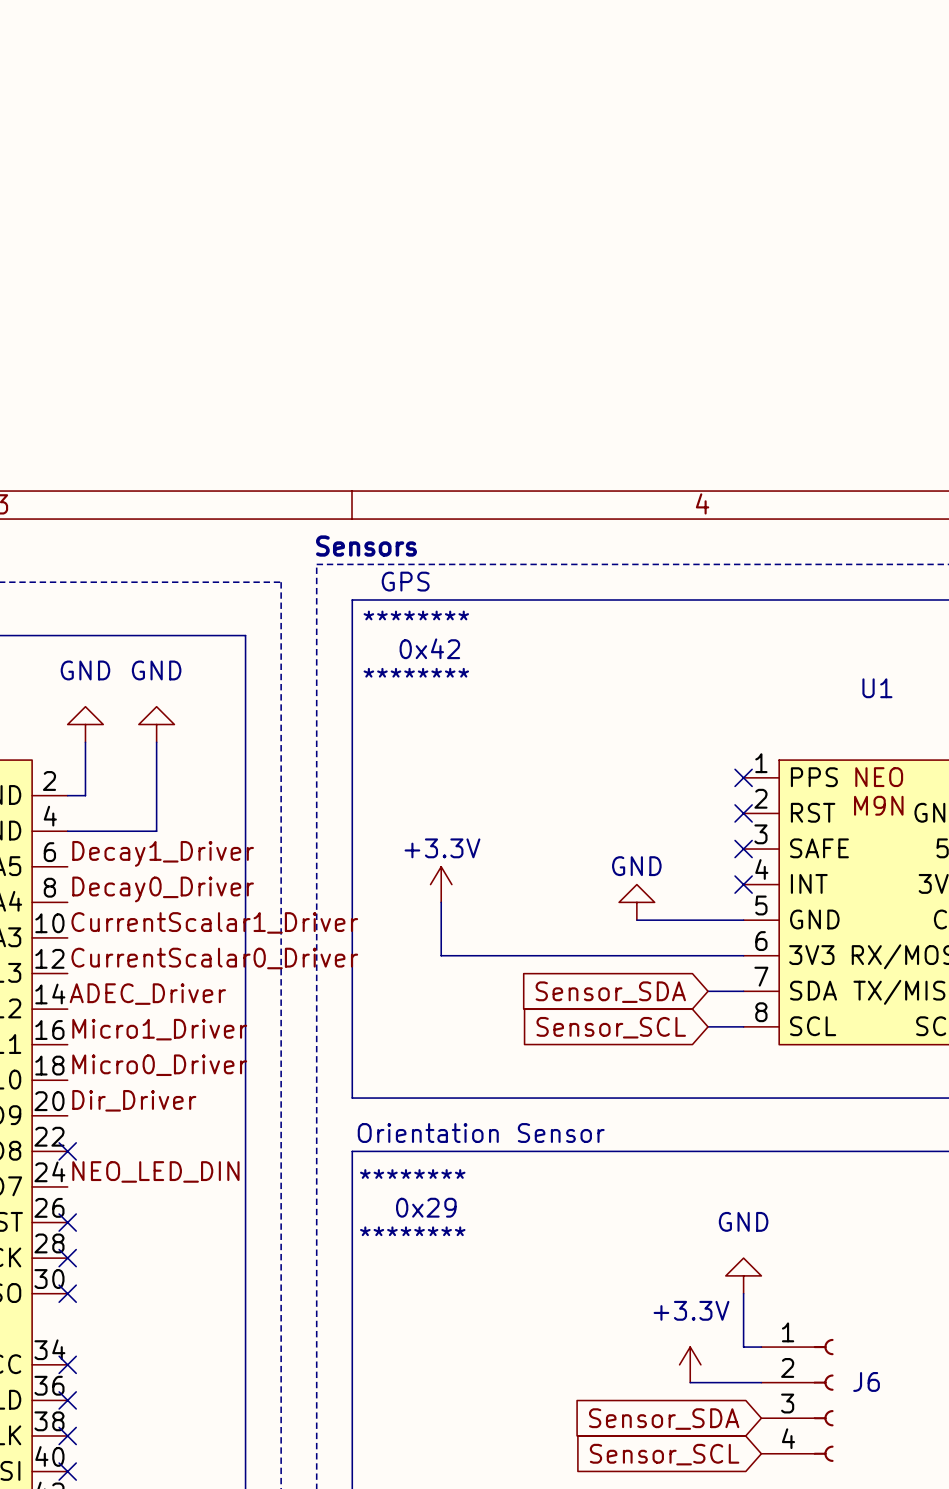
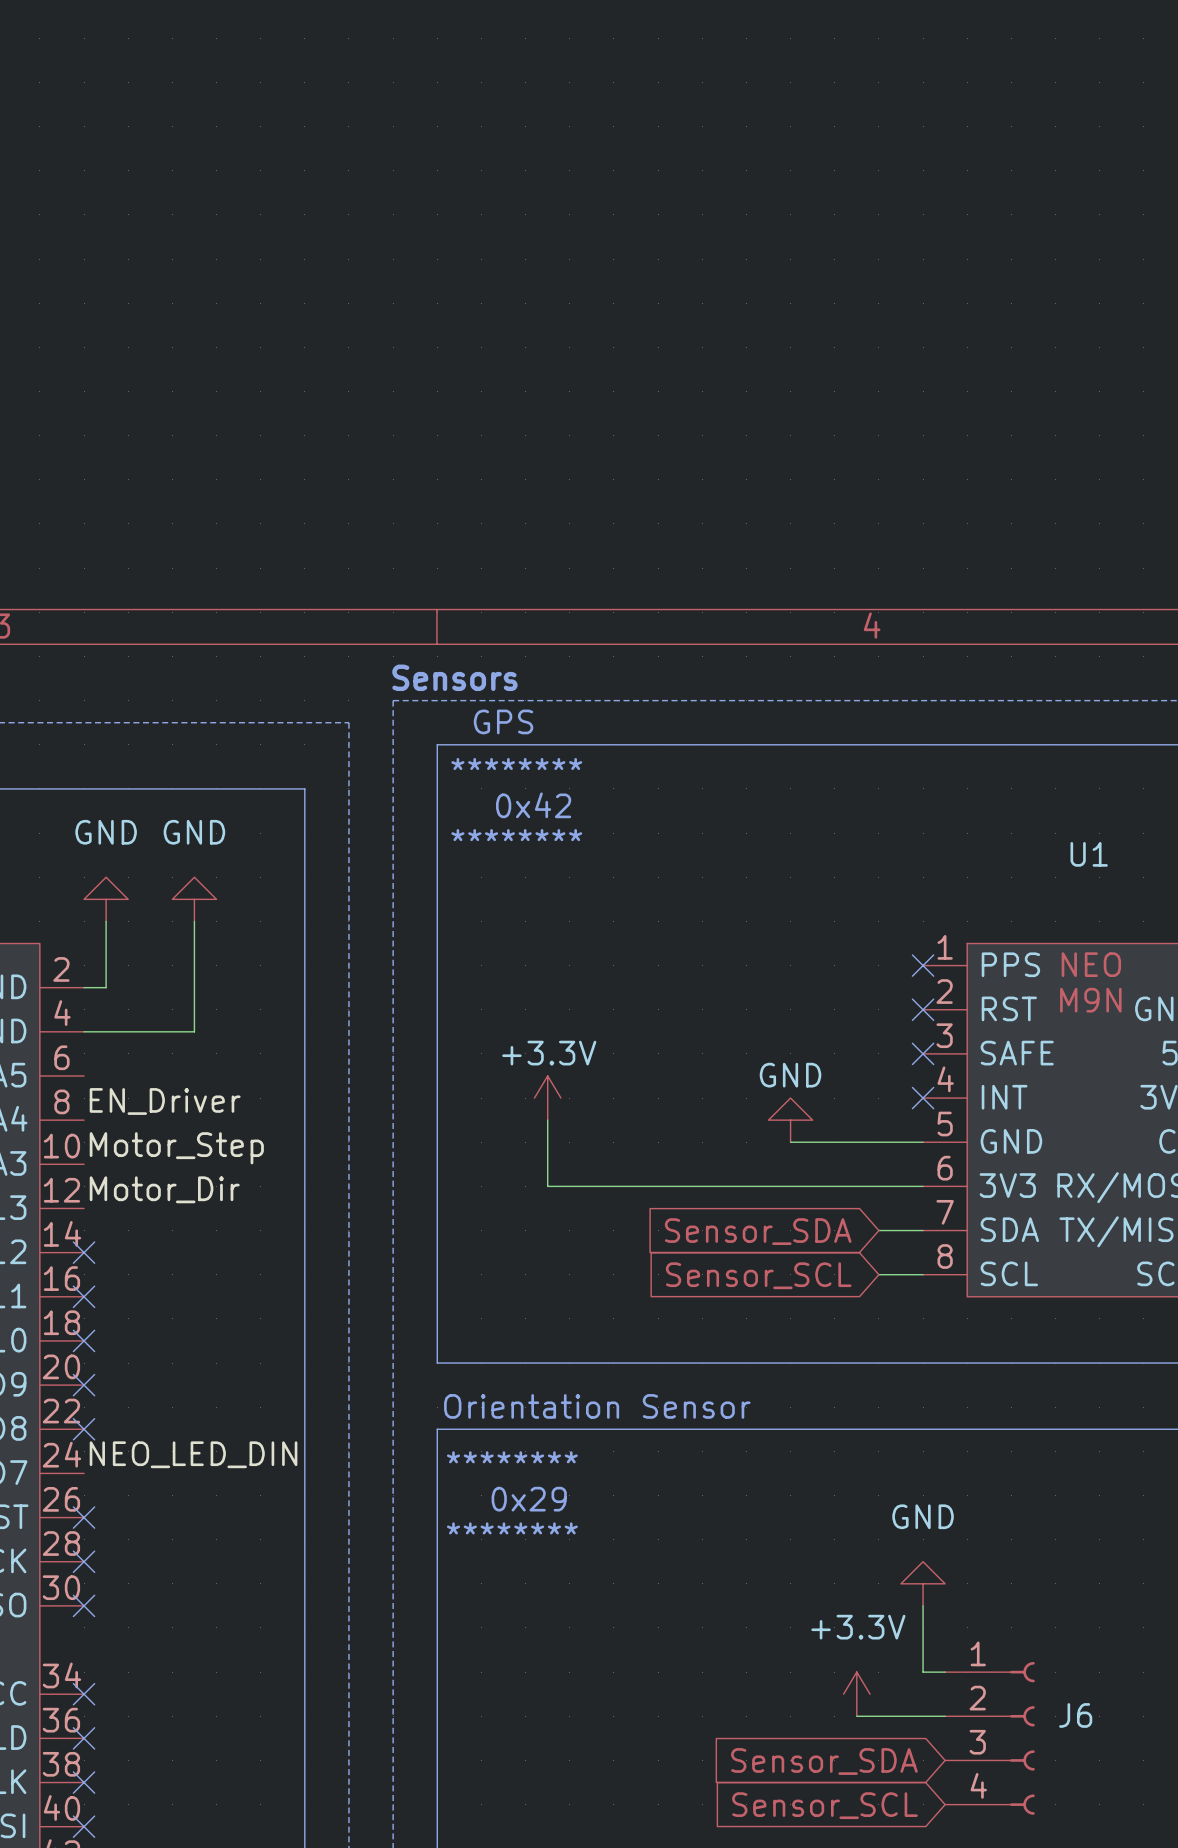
label: Decay1_Driver (163, 853) -> none
label: Decay0_Driver (163, 889) -> EN_Driver (165, 1101)
label: CurrentScalar1_Driver (214, 922) -> Motor_Step (176, 1148)
label: CurrentScalar0_Driver (214, 958) -> Motor_Dir (164, 1189)
label: ADEC_Driver (147, 994) -> none
no-connect mark: none -> (84, 1252)
label: Micro1_Driver (159, 1029) -> none
no-connect mark: none -> (84, 1296)
label: Micro0_Driver (159, 1065) -> none
no-connect mark: none -> (84, 1340)
label: Dir_Driver (134, 1100) -> none
no-connect mark: none -> (84, 1385)

